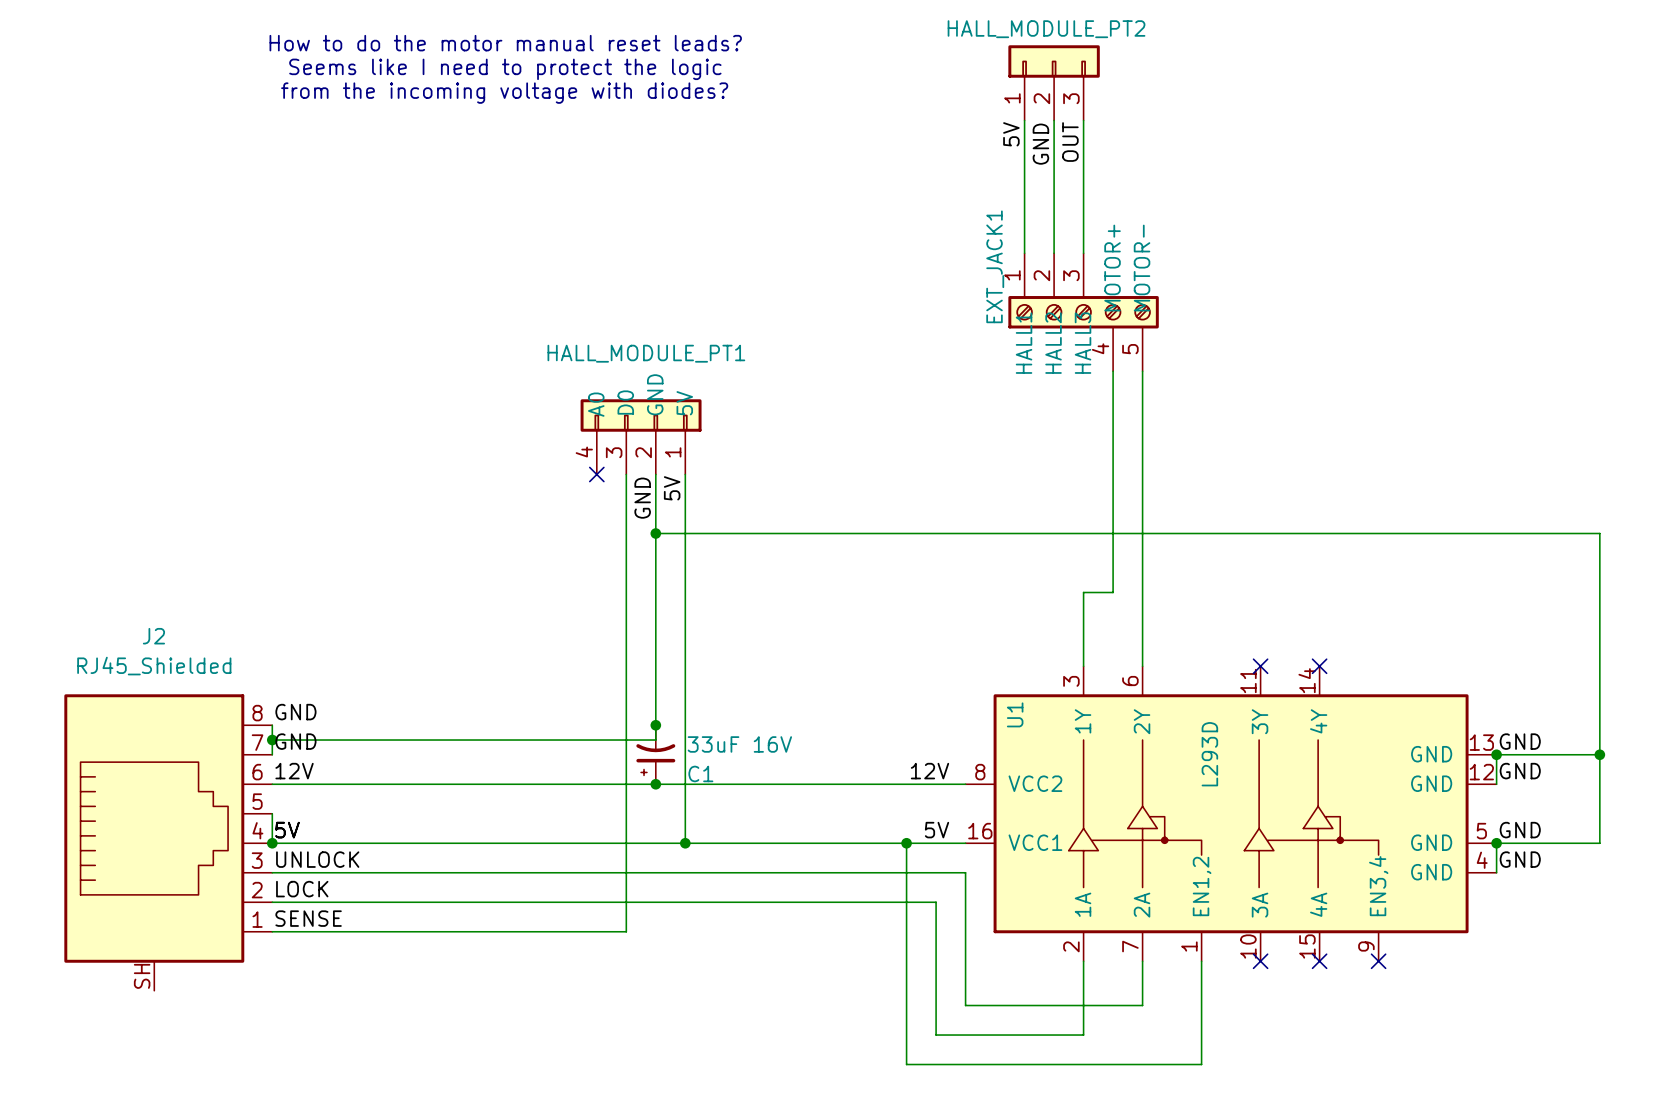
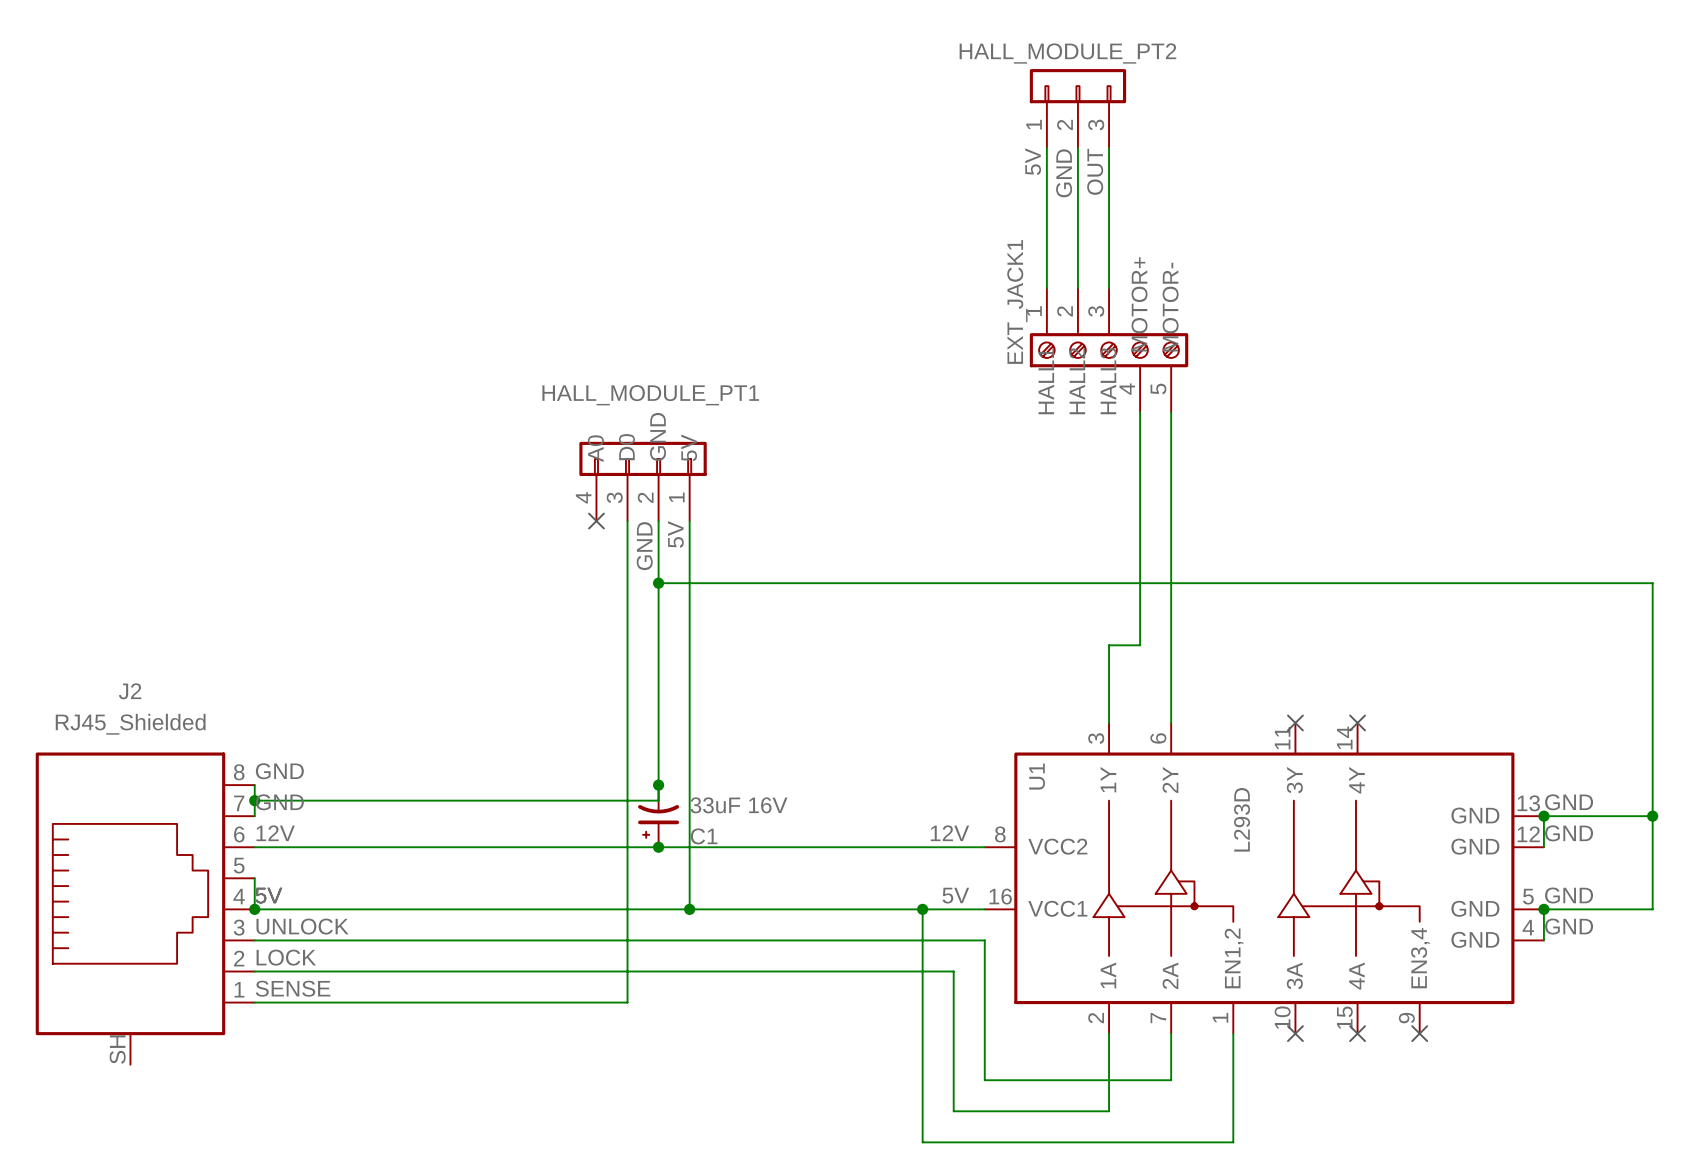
text: How to do the motor manual reset leads? (505, 43) -> none
text: Seems like I need to protect the logic (505, 69) -> none
text: from the incoming voltage with diodes? (504, 93) -> none

